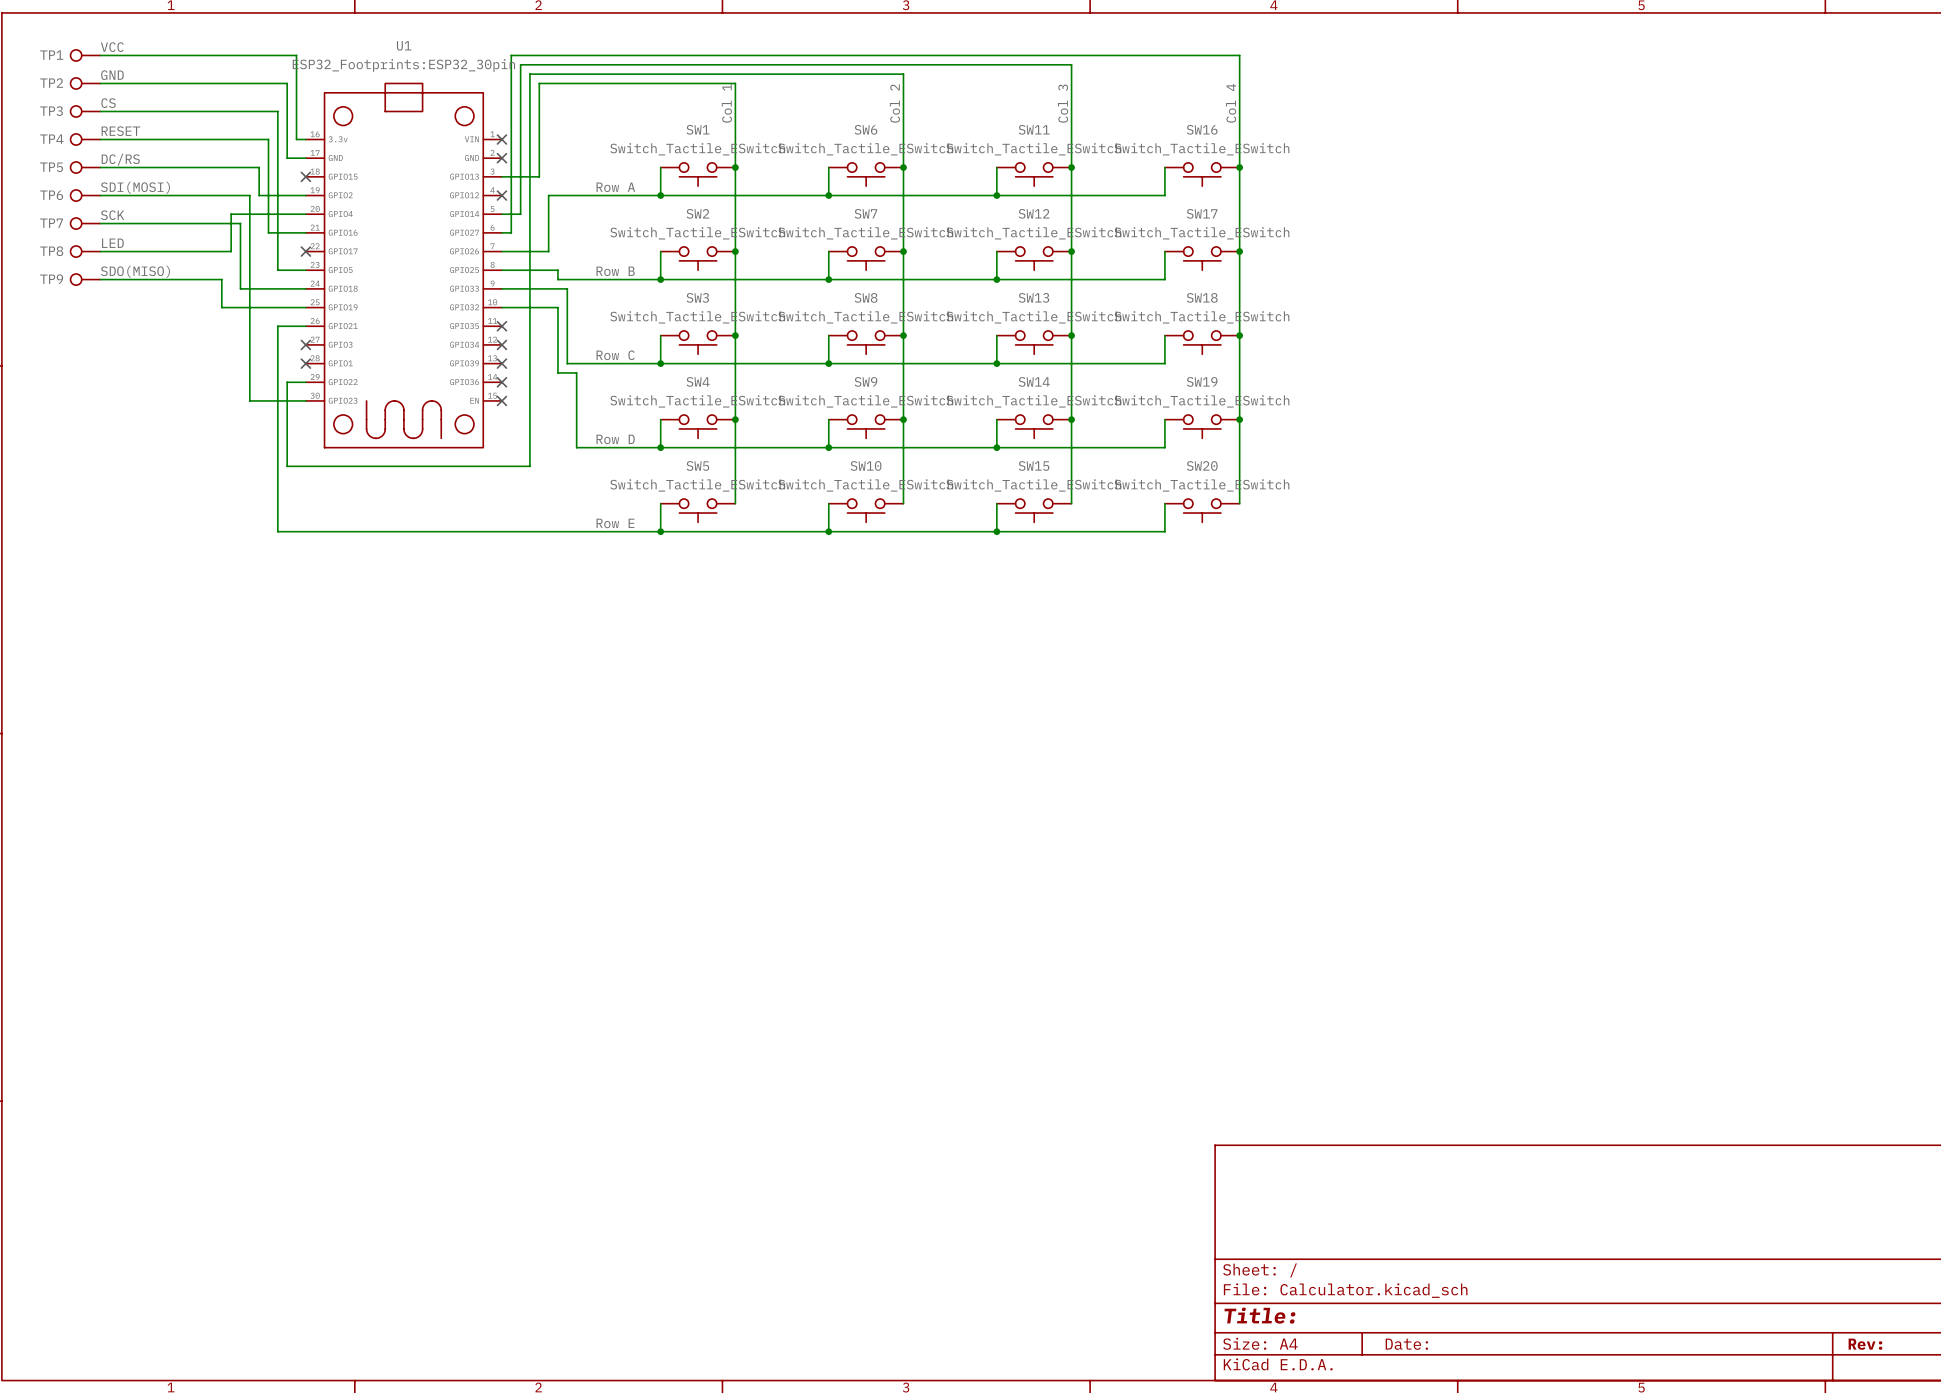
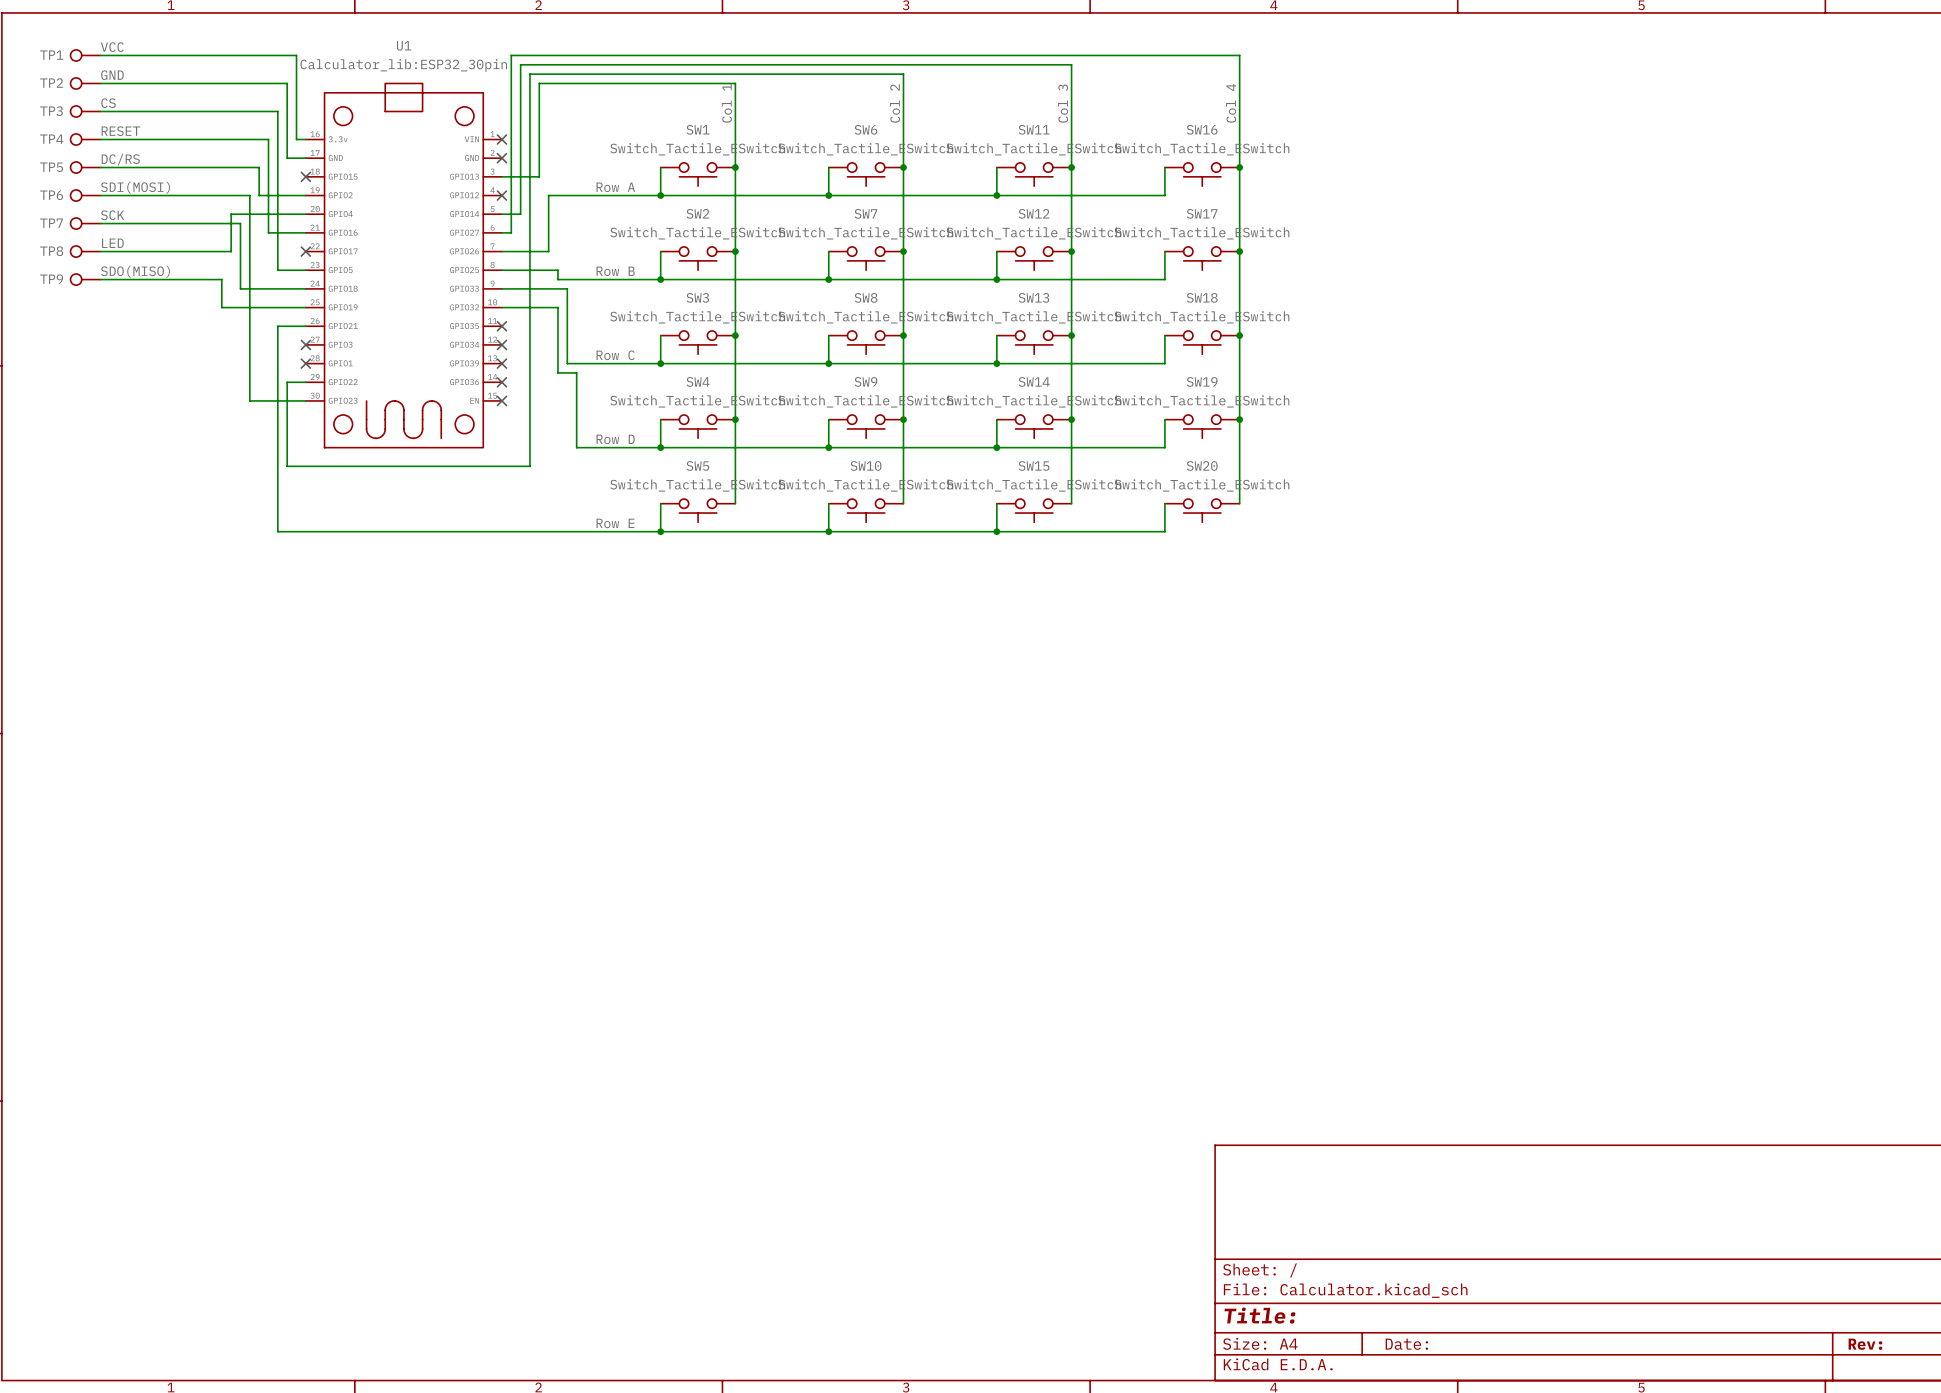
U1 text: ESP32_Footprints:ESP32_30pin (403, 65) -> Calculator_lib:ESP32_30pin (403, 65)

